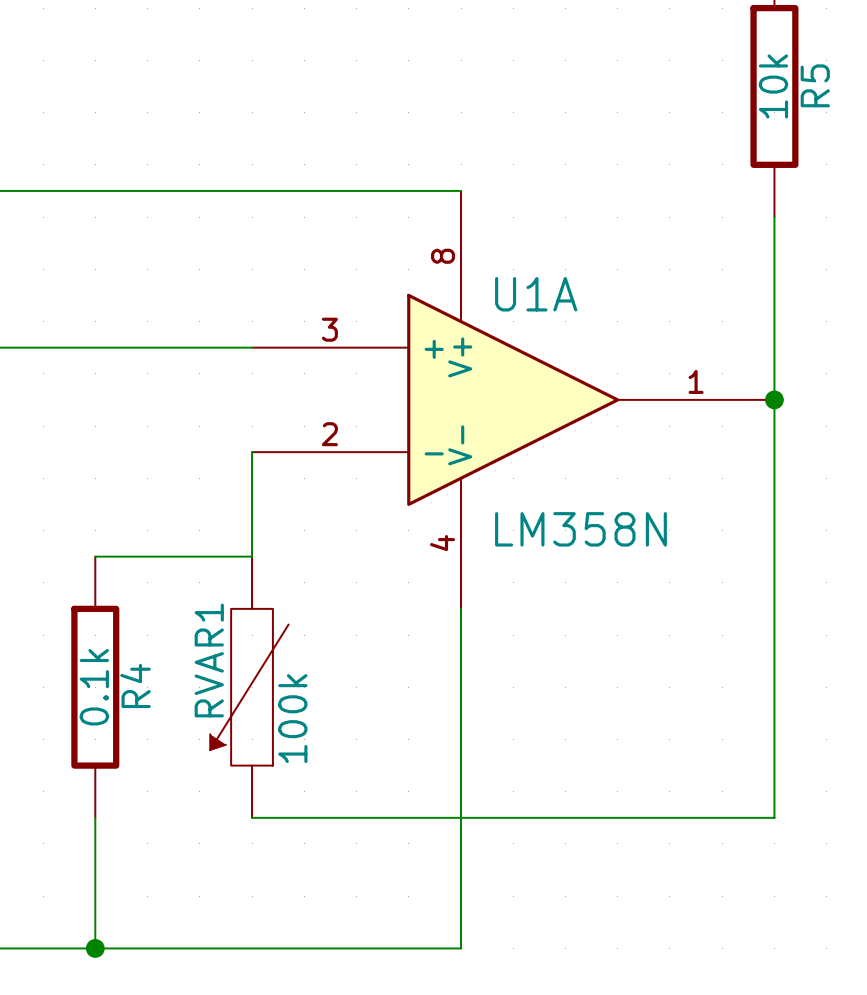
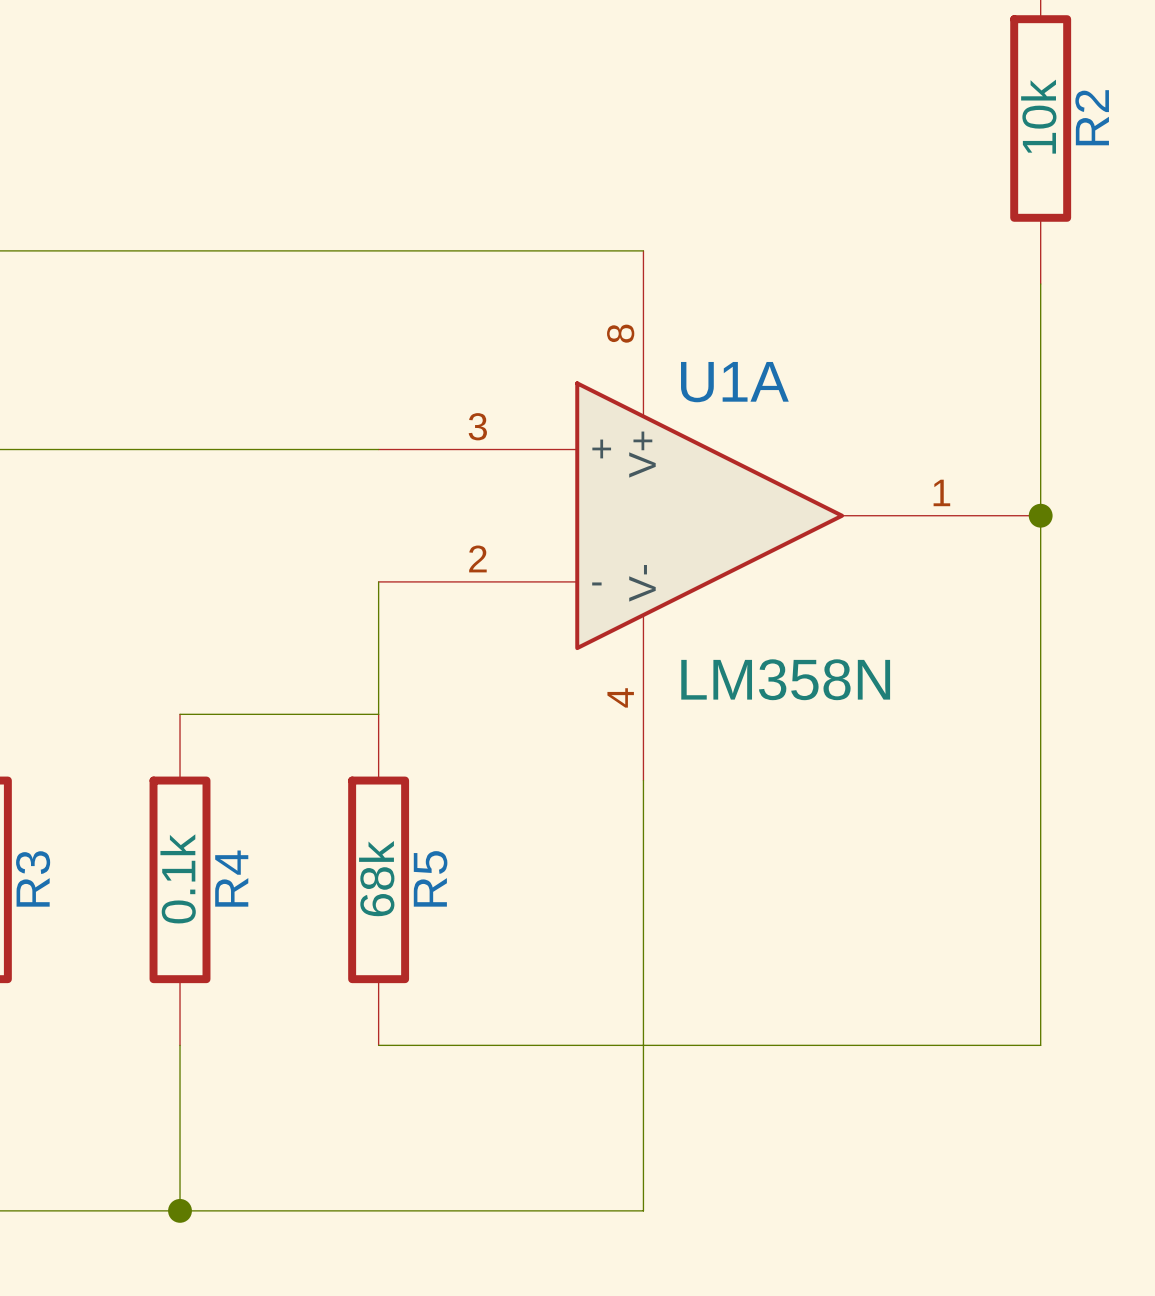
R5 name: R5 (815, 85) -> R2 (1092, 117)
RVAR1: 100k (249, 687) -> none
R5: none -> 68k (378, 879)

